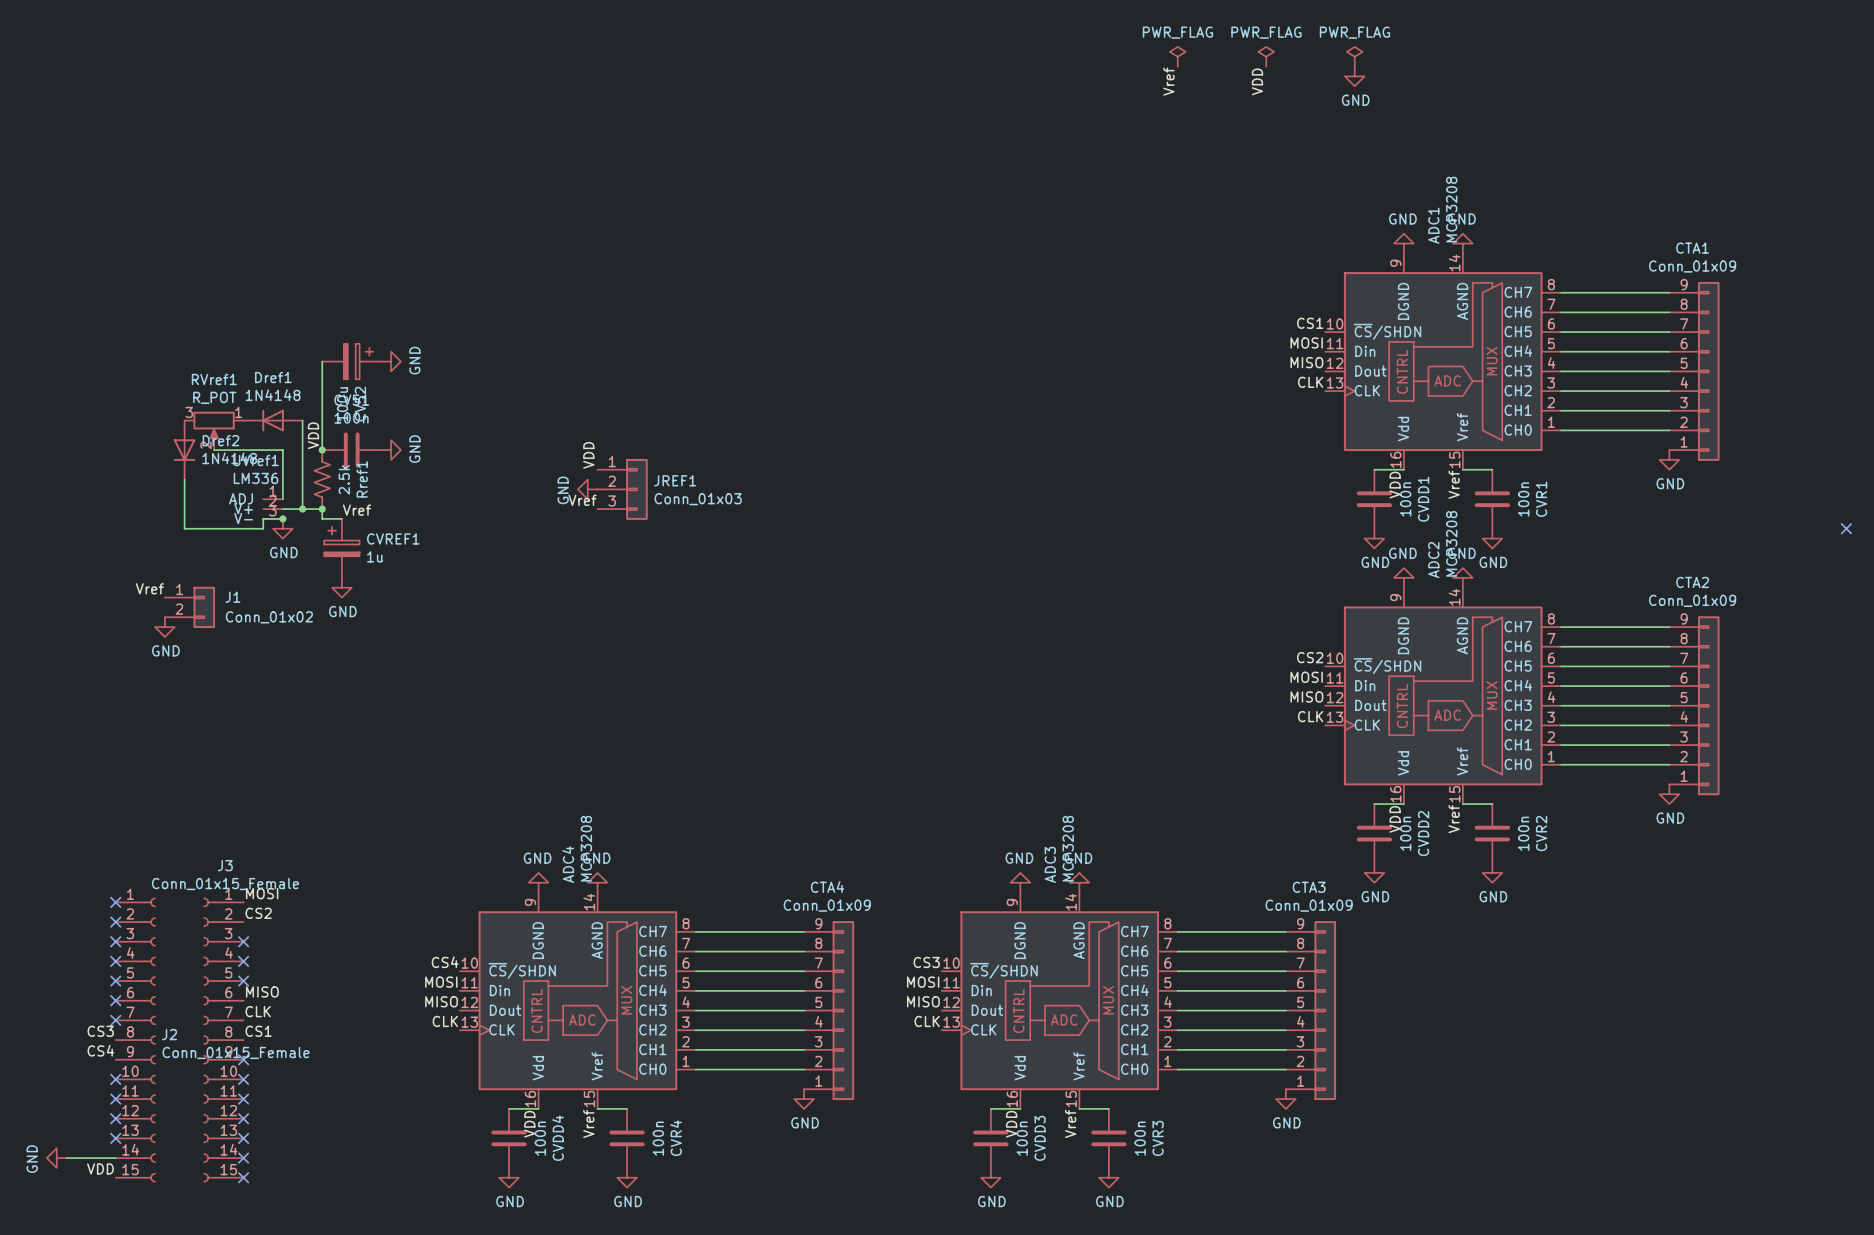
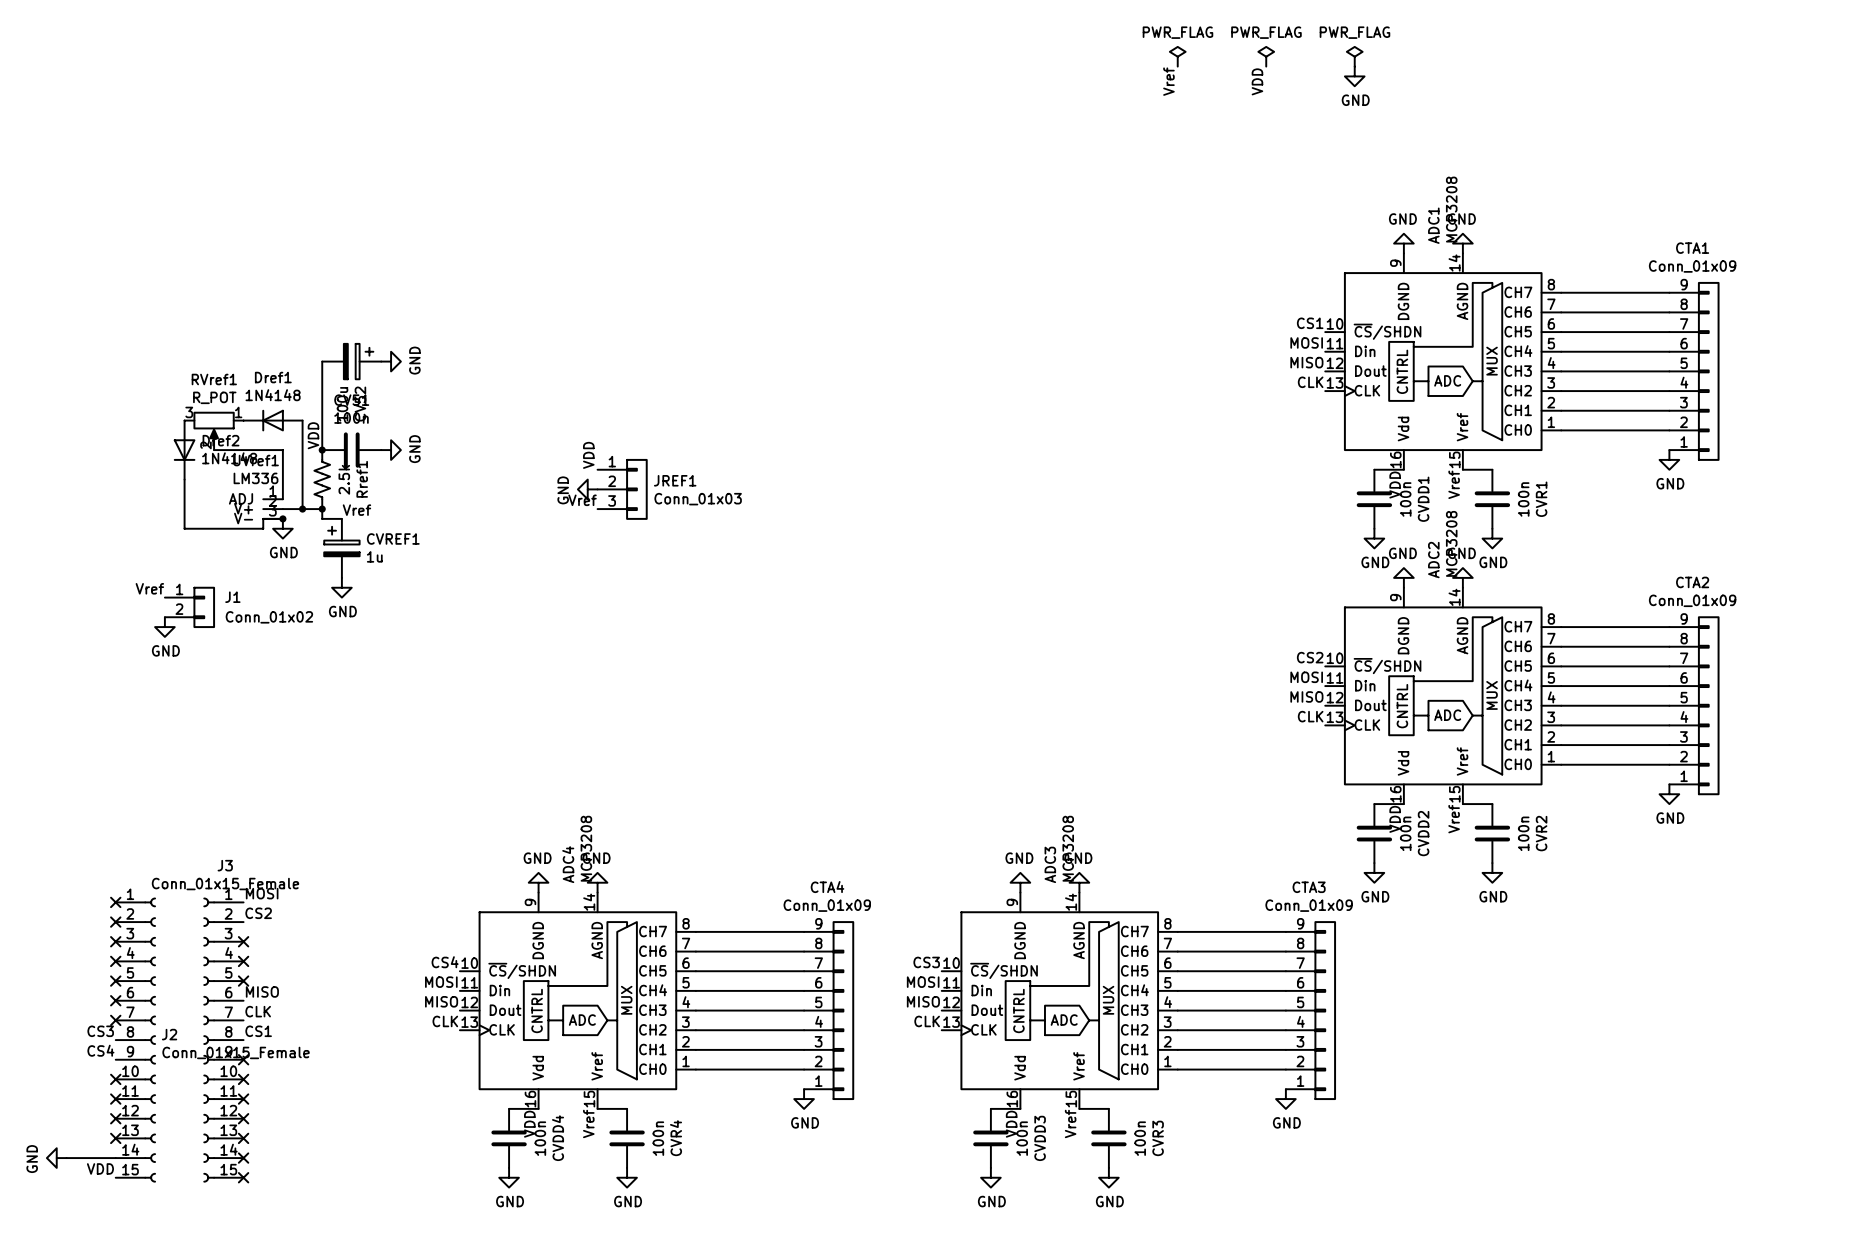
no-connect mark: (1846, 528) -> none

